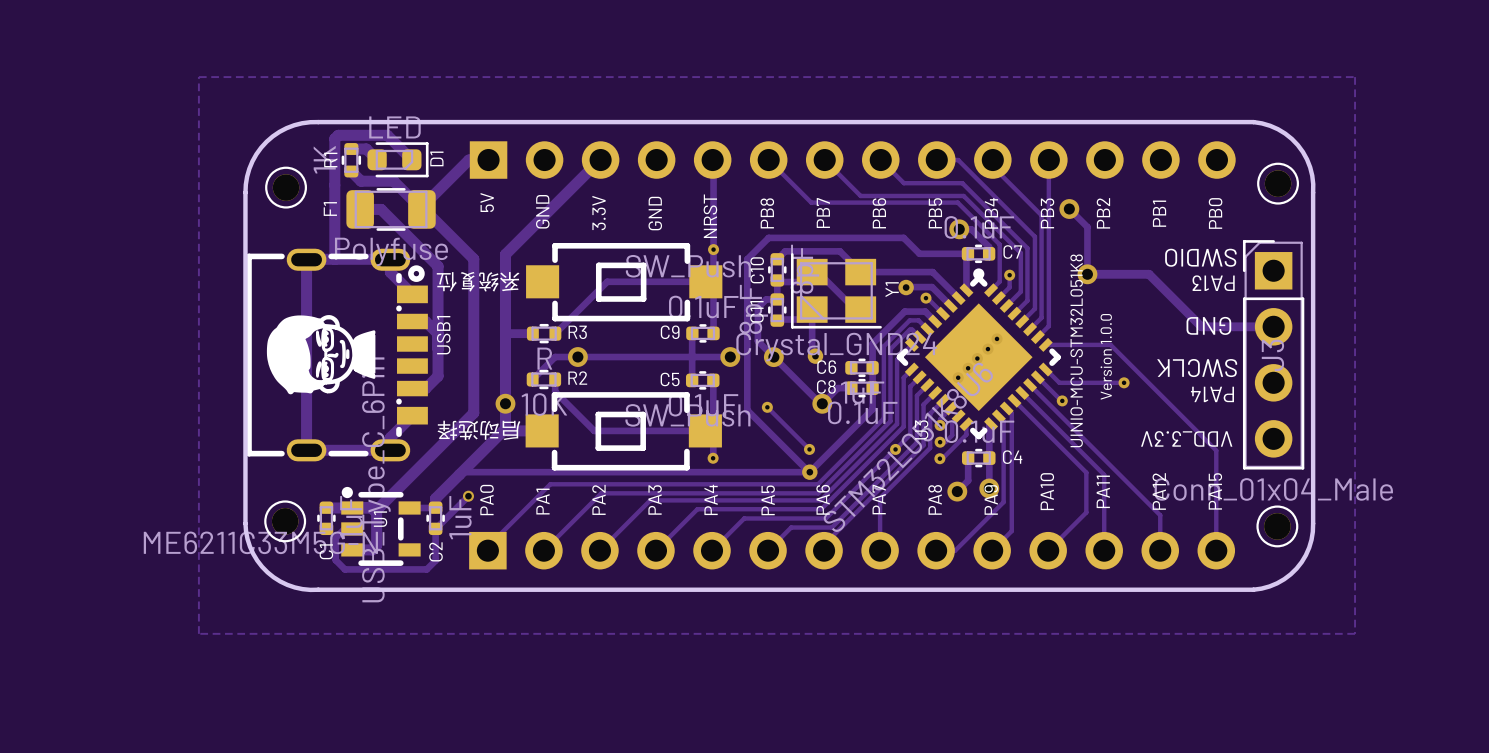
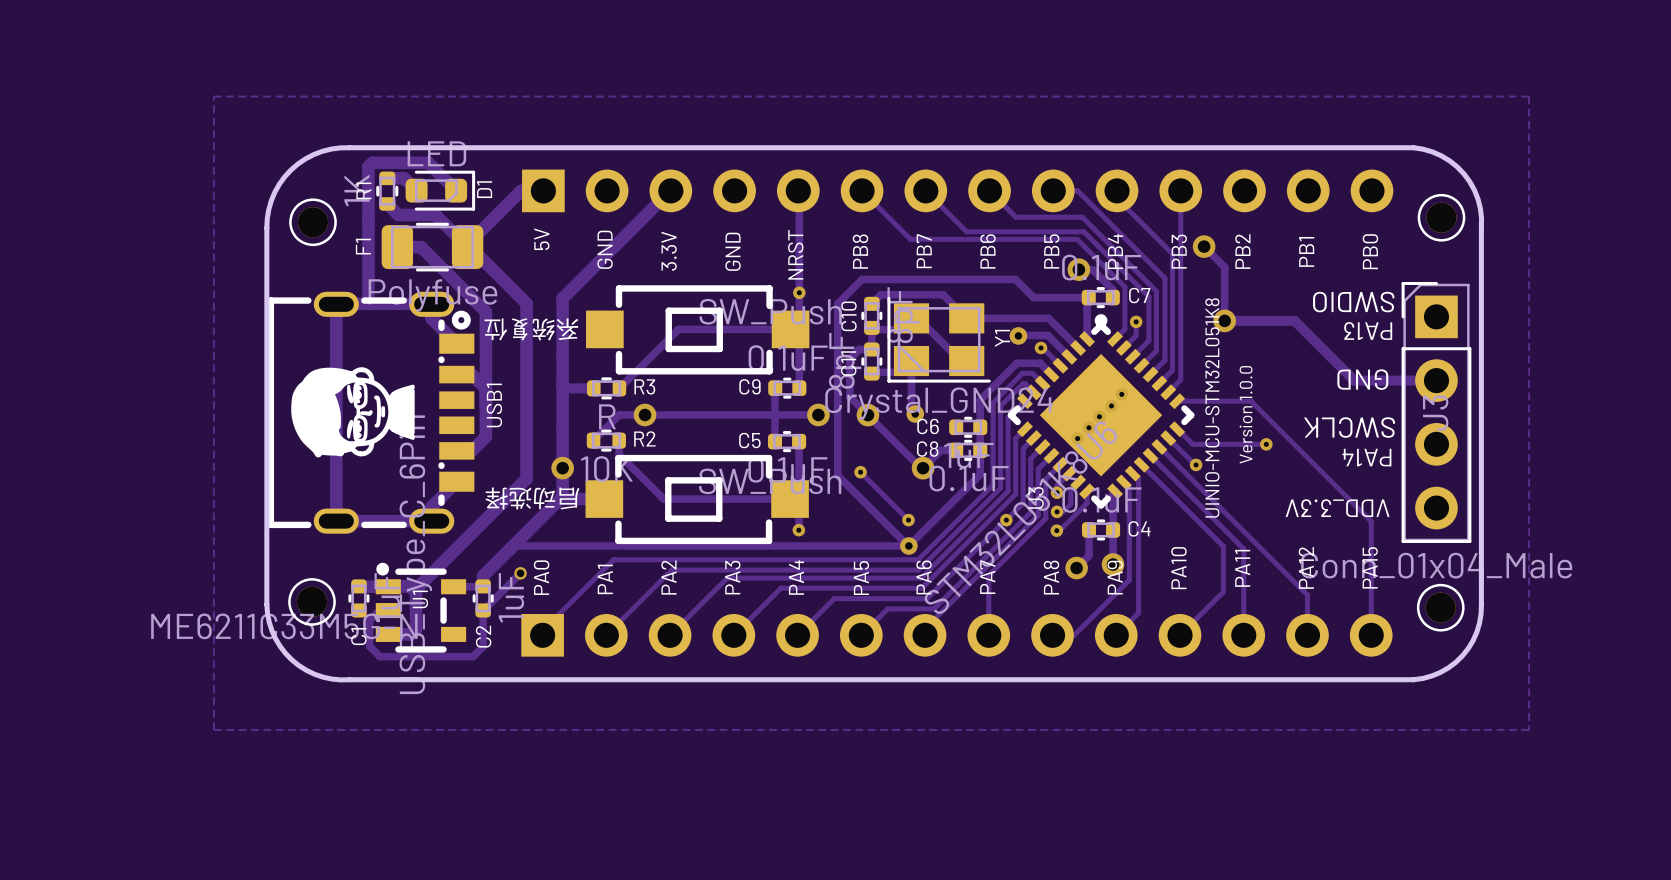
USB1 name position: USB1 (443, 335) -> USB1 (494, 405)

